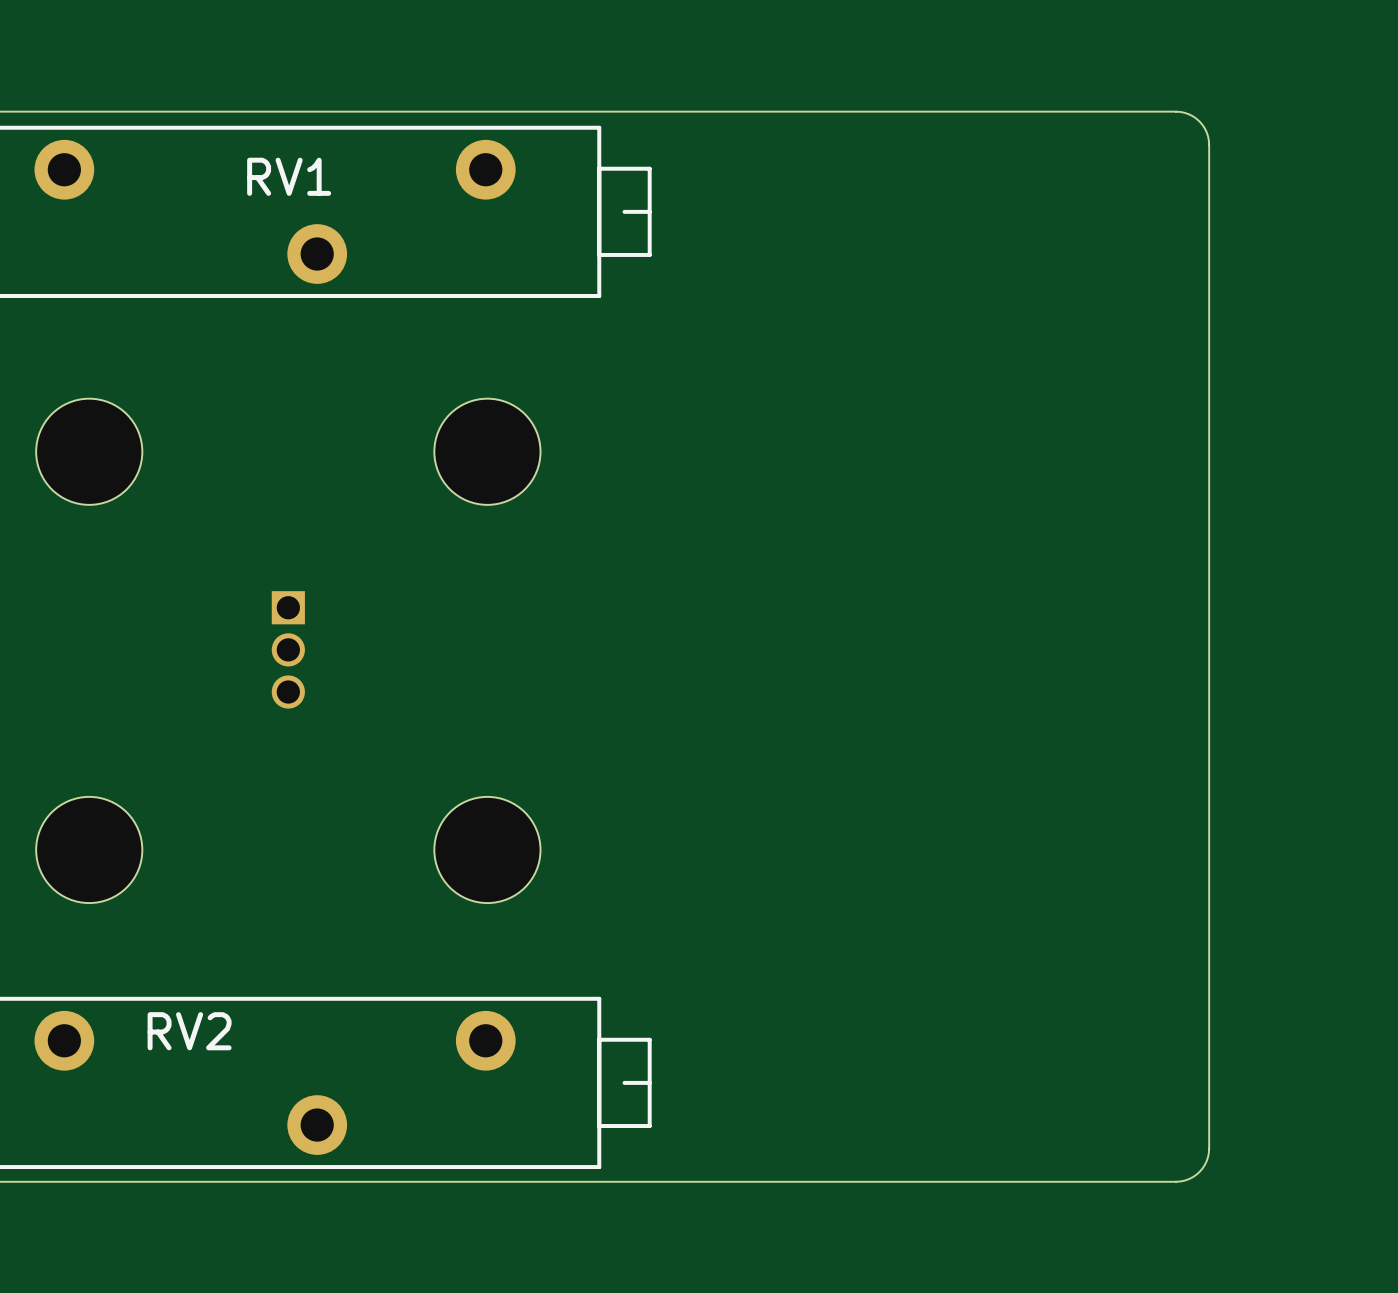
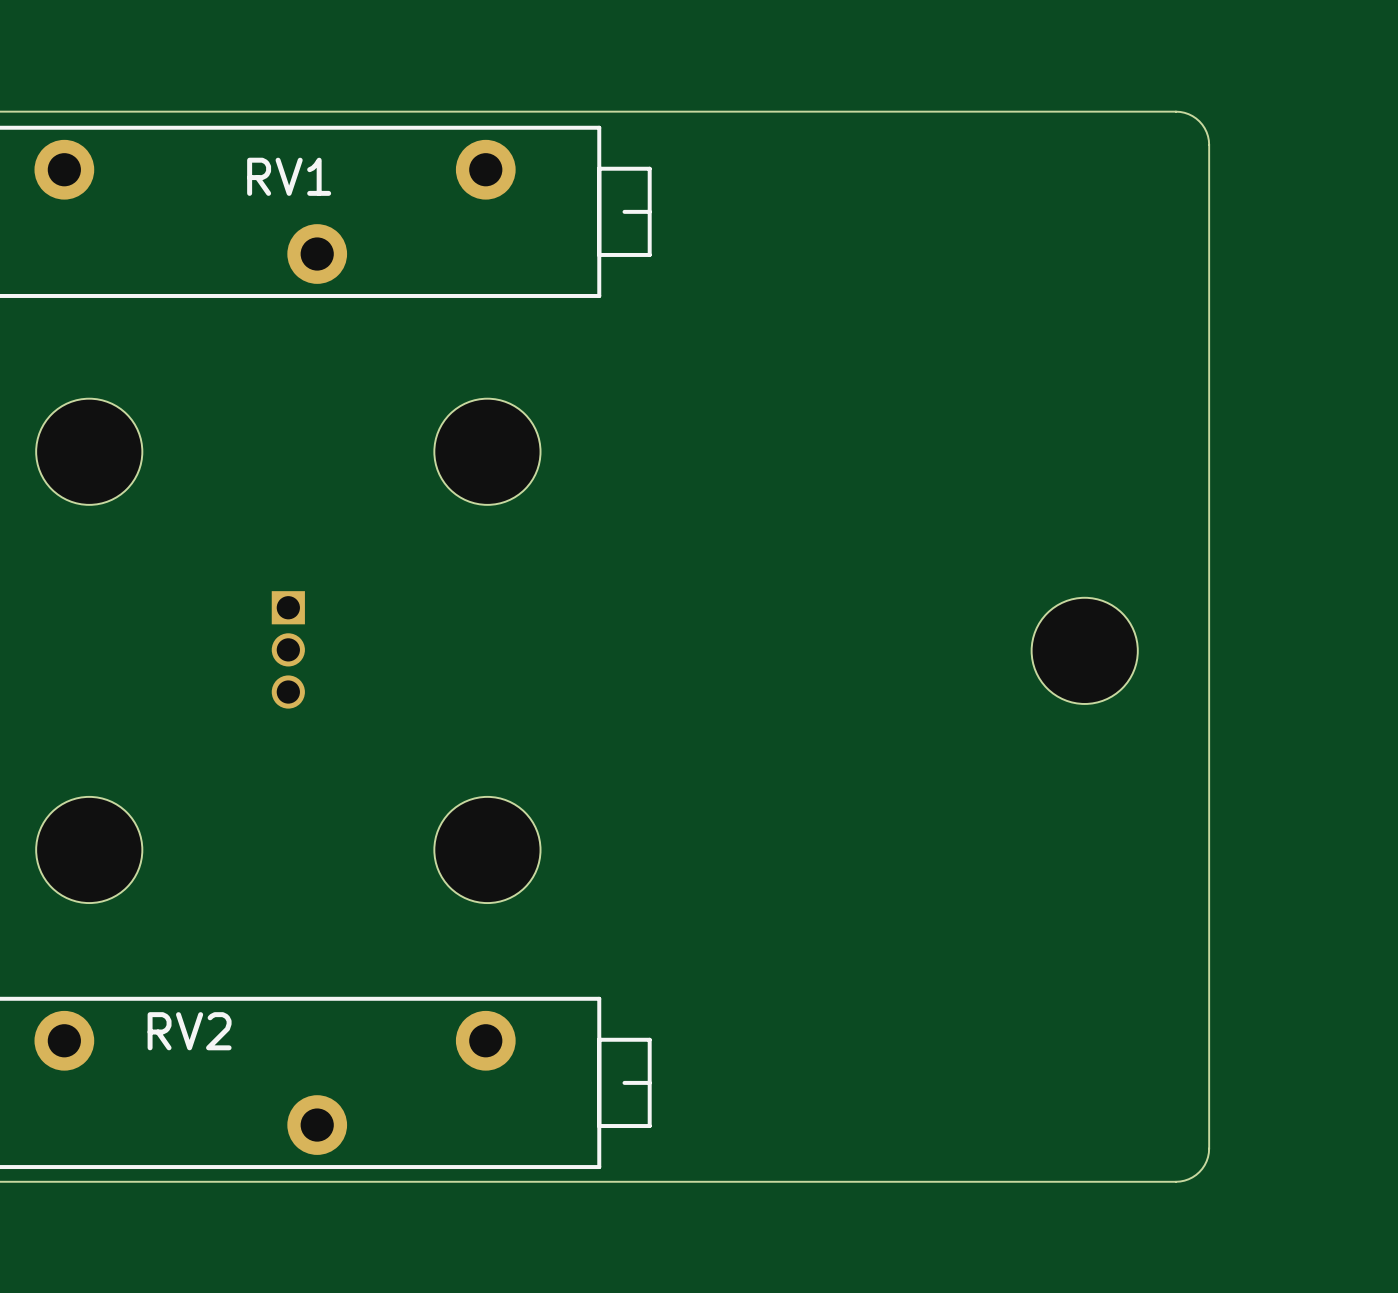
part: none -> (1084, 650)

